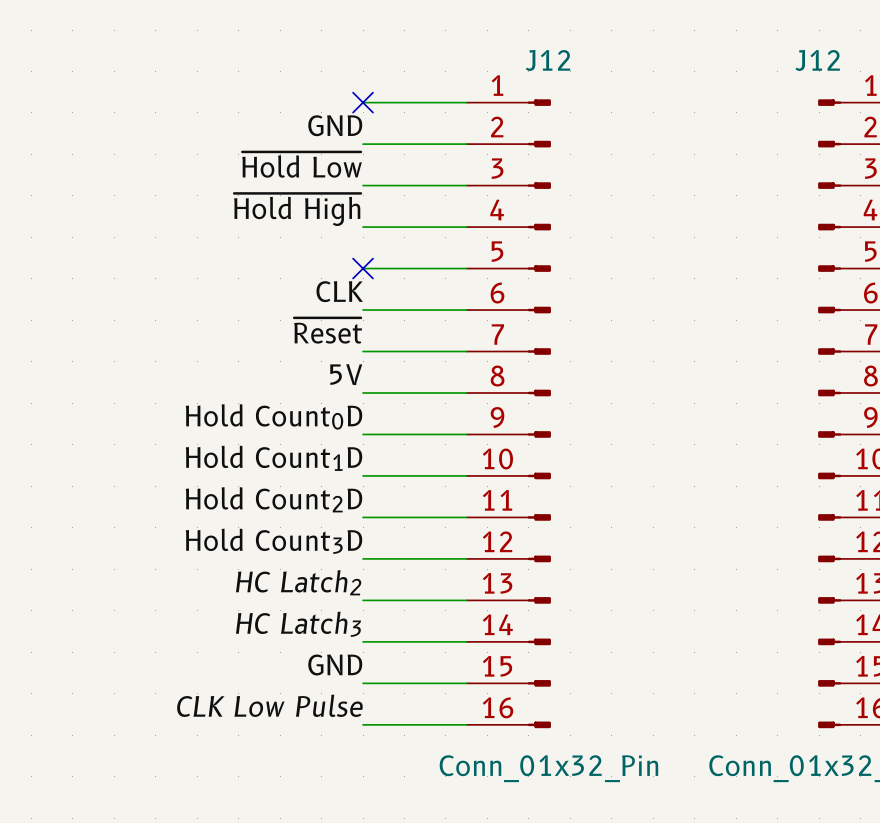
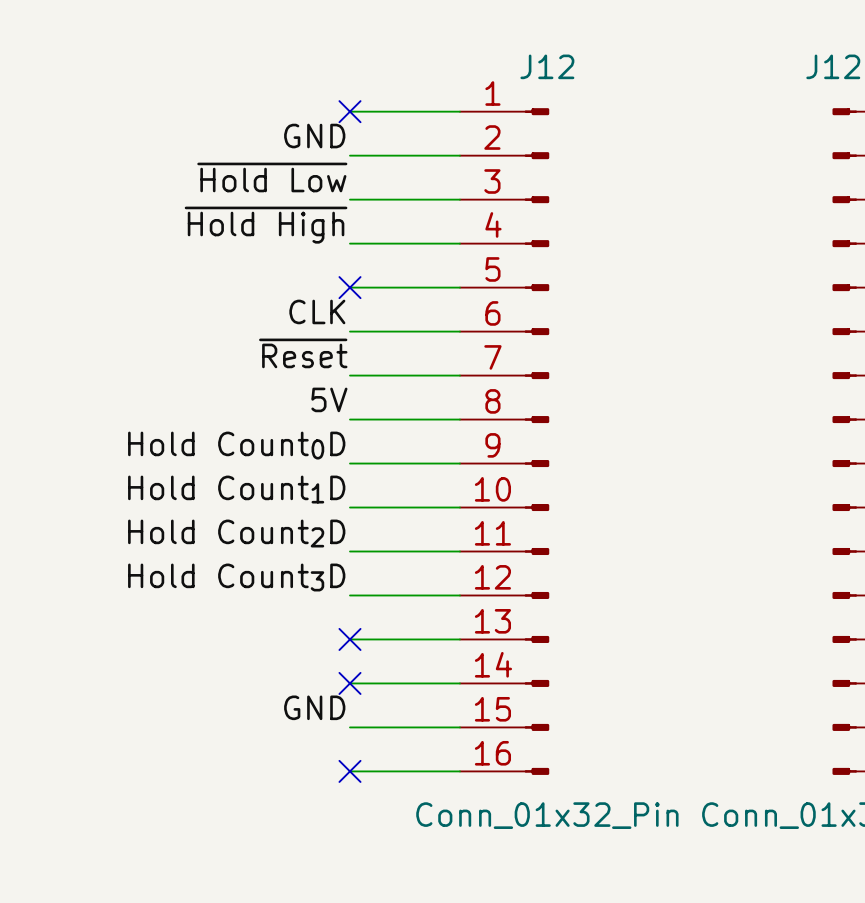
label: HC Latch2 (298, 582) -> none
no-connect mark: none -> (349, 639)
label: HC Latch3 (298, 624) -> none
no-connect mark: none -> (349, 683)
label: CLK Low Pulse (269, 705) -> none
no-connect mark: none -> (349, 771)

